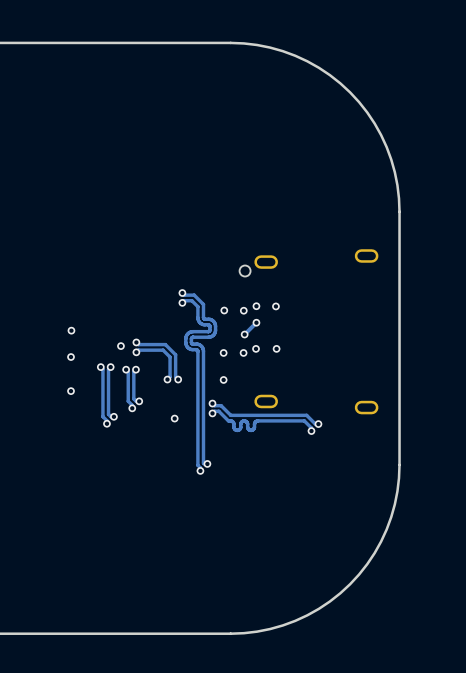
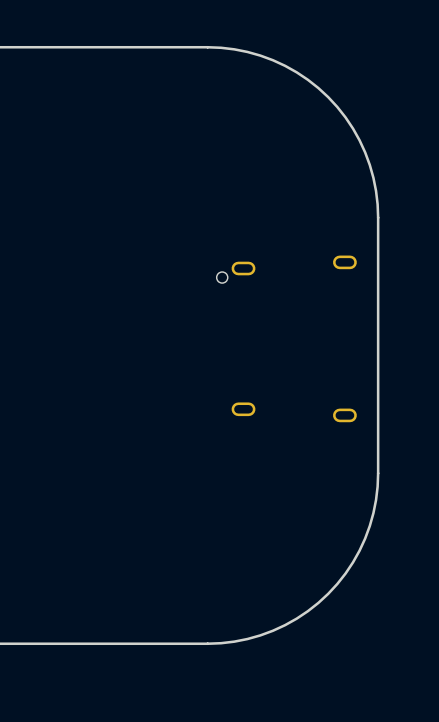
track: (182, 293) (184, 295) (194, 295) (203, 304) (203, 318) (211, 319) (215, 324) (215, 331) (211, 336) (192, 337) (191, 339) (192, 343) (199, 344) (203, 349) (203, 463) (207, 463) -> none
via: (182, 293) -> none
track: (182, 302) (184, 300) (191, 300) (197, 306) (199, 322) (209, 326) (208, 331) (189, 332) (185, 338) (187, 347) (197, 351) (197, 465) (200, 470) -> none
via: (182, 302) -> none
via: (256, 306) -> none
via: (275, 306) -> none
via: (224, 310) -> none
via: (243, 310) -> none
track: (256, 322) (244, 334) -> none
via: (256, 322) -> none
via: (71, 330) -> none
via: (244, 334) -> none
track: (136, 342) (138, 344) (165, 344) (175, 354) (175, 376) (178, 379) -> none
via: (136, 342) -> none
via: (120, 346) -> none
via: (256, 348) -> none
via: (276, 348) -> none
track: (136, 352) (138, 350) (163, 350) (170, 357) (170, 376) (167, 379) -> none
via: (136, 352) -> none
via: (223, 352) -> none
via: (243, 352) -> none
via: (71, 357) -> none
track: (100, 367) (102, 369) (102, 416) (106, 420) (106, 423) -> none
via: (100, 367) -> none
track: (110, 367) (108, 369) (108, 414) (113, 416) -> none
via: (110, 367) -> none
track: (126, 369) (128, 371) (128, 401) (132, 405) (132, 408) -> none
via: (126, 369) -> none
track: (135, 369) (133, 371) (133, 398) (139, 401) -> none
via: (135, 369) -> none
via: (167, 379) -> none
via: (178, 379) -> none
via: (223, 379) -> none
via: (71, 391) -> none
via: (139, 401) -> none
track: (212, 403) (214, 405) (221, 405) (230, 415) (306, 415) (315, 424) (318, 424) -> none
via: (212, 403) -> none
via: (132, 408) -> none
track: (212, 413) (218, 411) (228, 420) (233, 422) (236, 430) (240, 429) (243, 421) (246, 422) (247, 428) (251, 430) (253, 429) (257, 421) (304, 420) (311, 428) (311, 431) -> none
via: (212, 413) -> none
via: (113, 416) -> none
via: (174, 418) -> none
via: (106, 423) -> none
via: (318, 424) -> none
via: (311, 431) -> none
via: (207, 463) -> none
via: (200, 470) -> none

